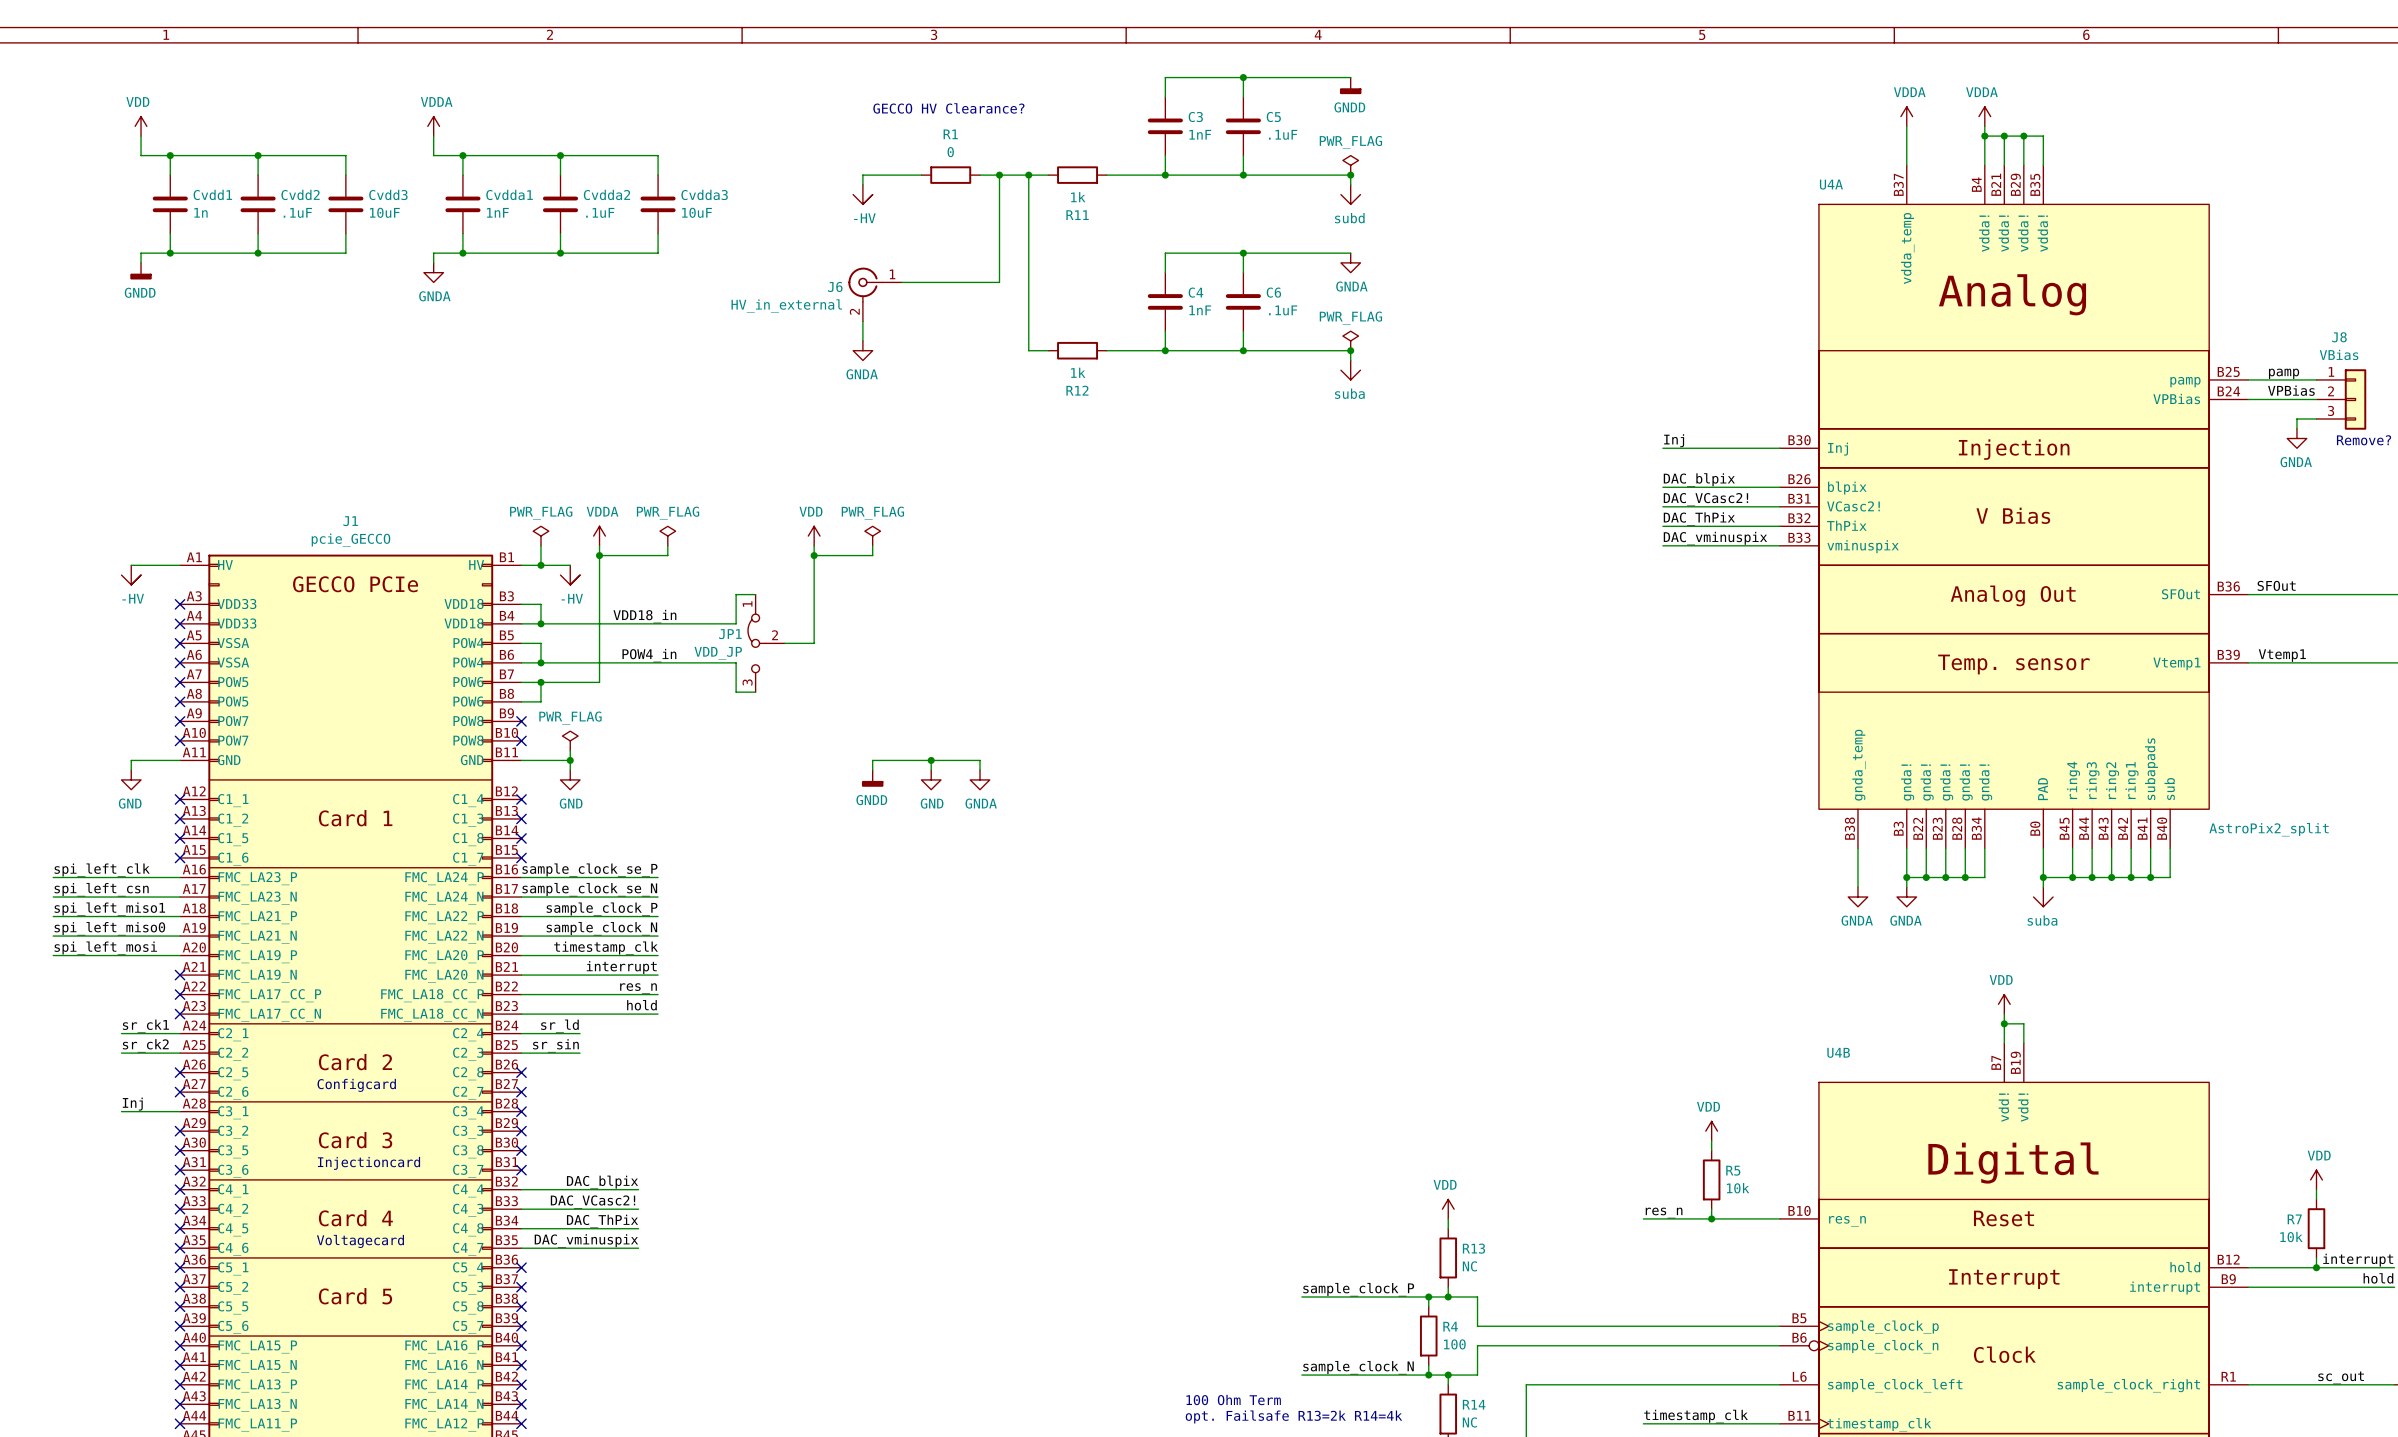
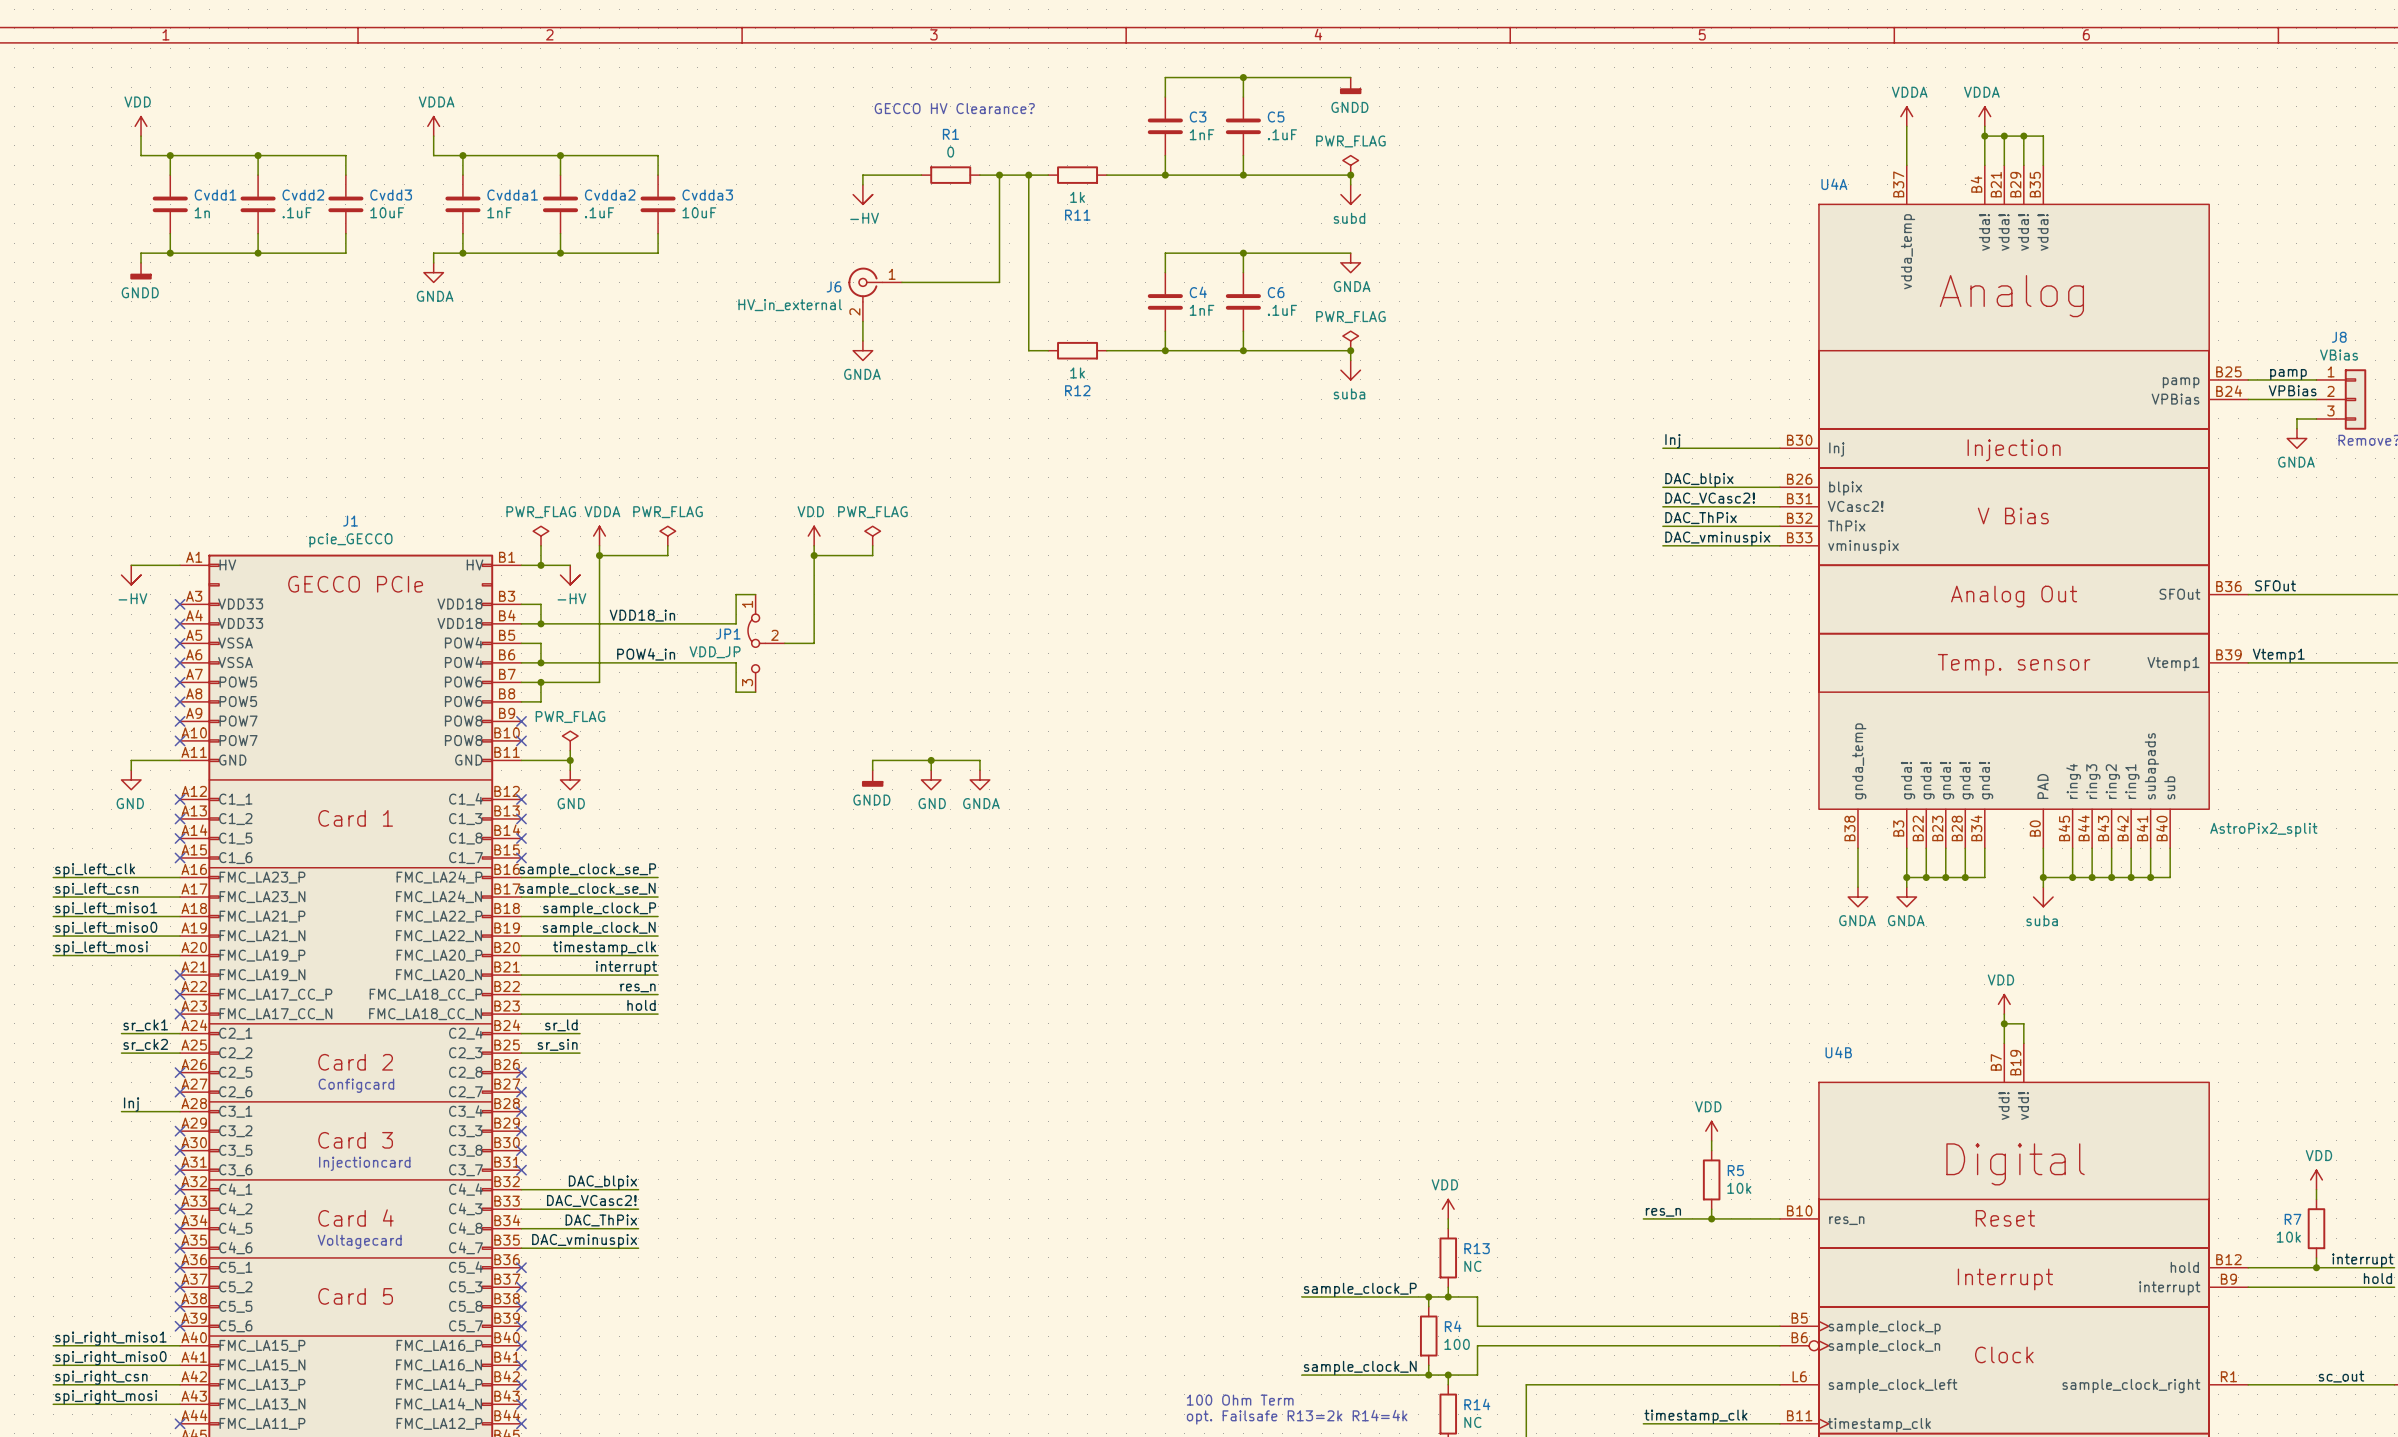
label: none -> spi_right_miso1 (110, 1338)
wire: none -> (53, 1345) (180, 1345)
no-connect mark: (180, 1345) -> none
label: none -> spi_right_miso0 (110, 1358)
wire: none -> (53, 1365) (180, 1365)
no-connect mark: (180, 1365) -> none
label: none -> spi_right_csn (101, 1377)
wire: none -> (53, 1384) (180, 1384)
no-connect mark: (180, 1384) -> none
label: none -> spi_right_mosi (106, 1397)
wire: none -> (53, 1404) (180, 1404)
no-connect mark: (180, 1404) -> none

